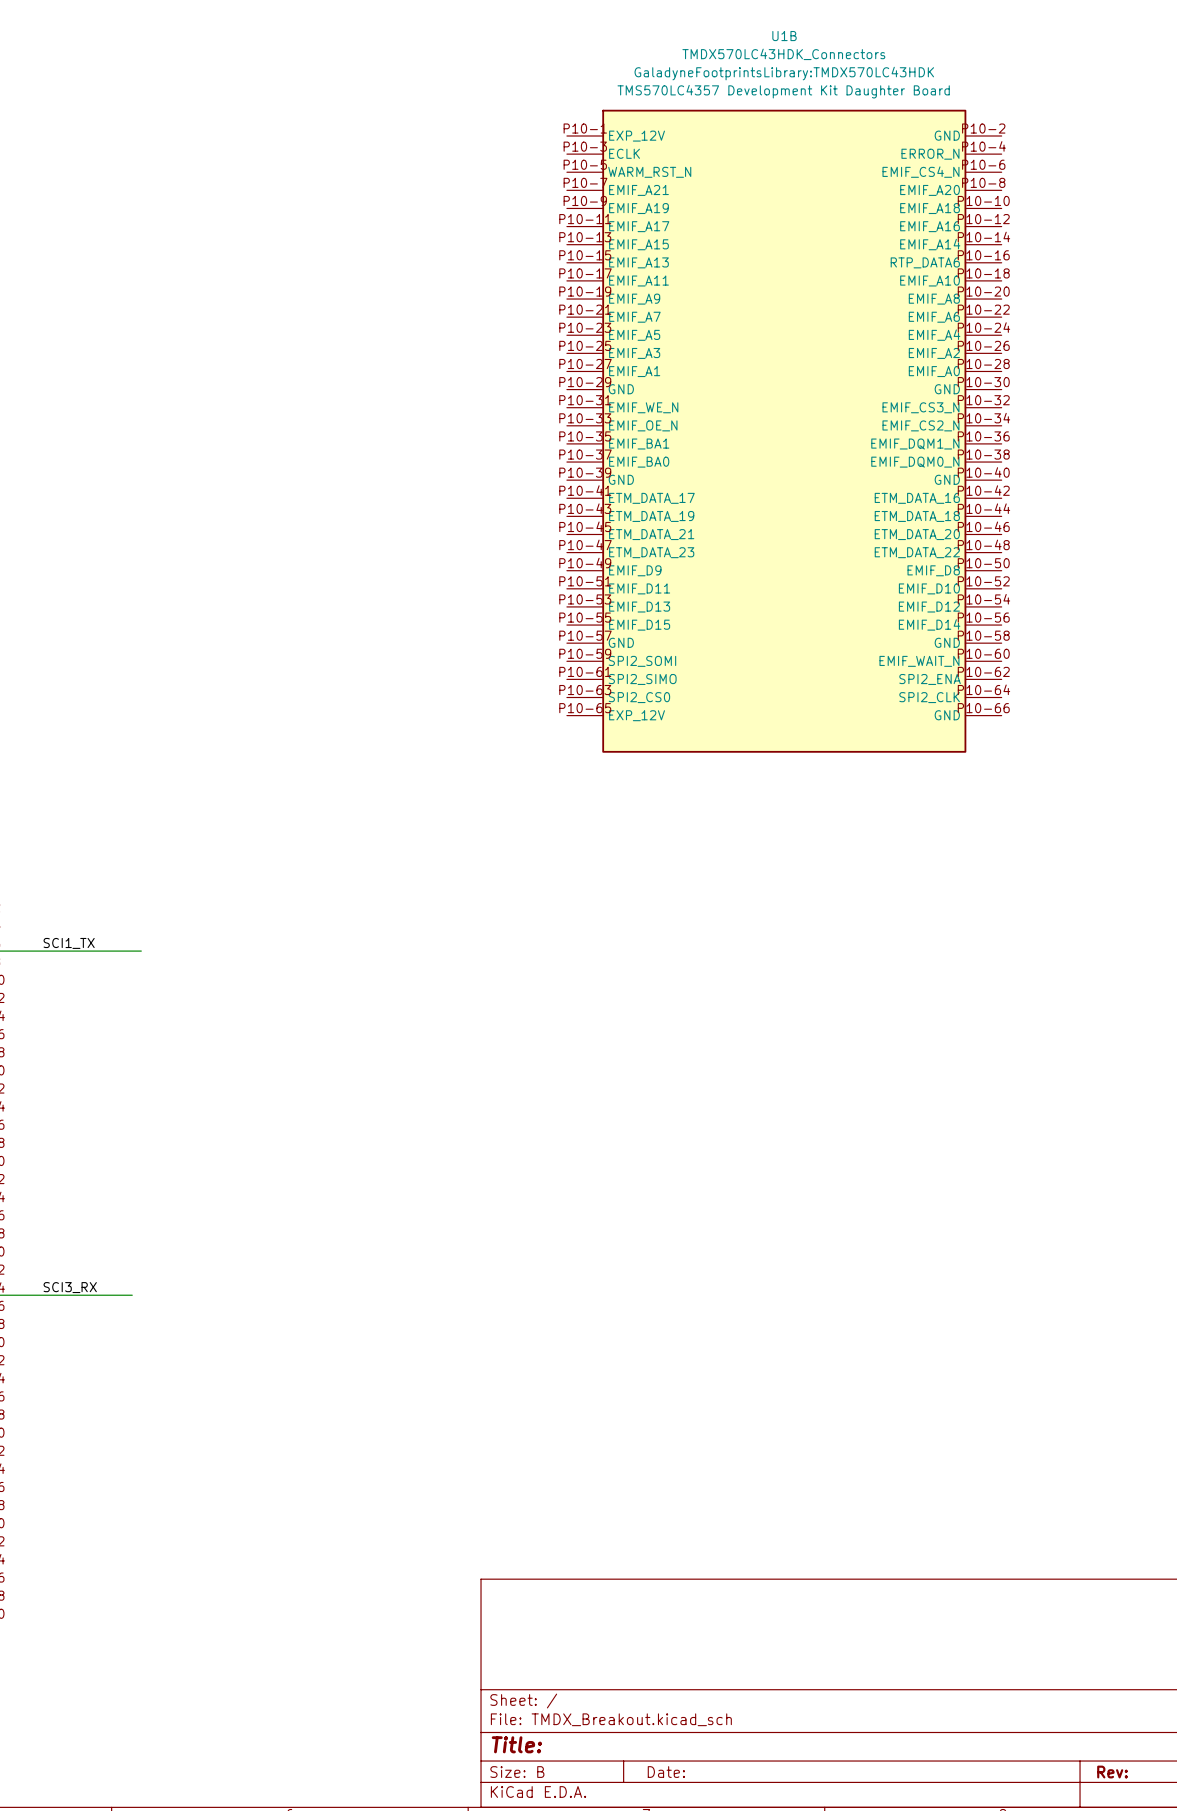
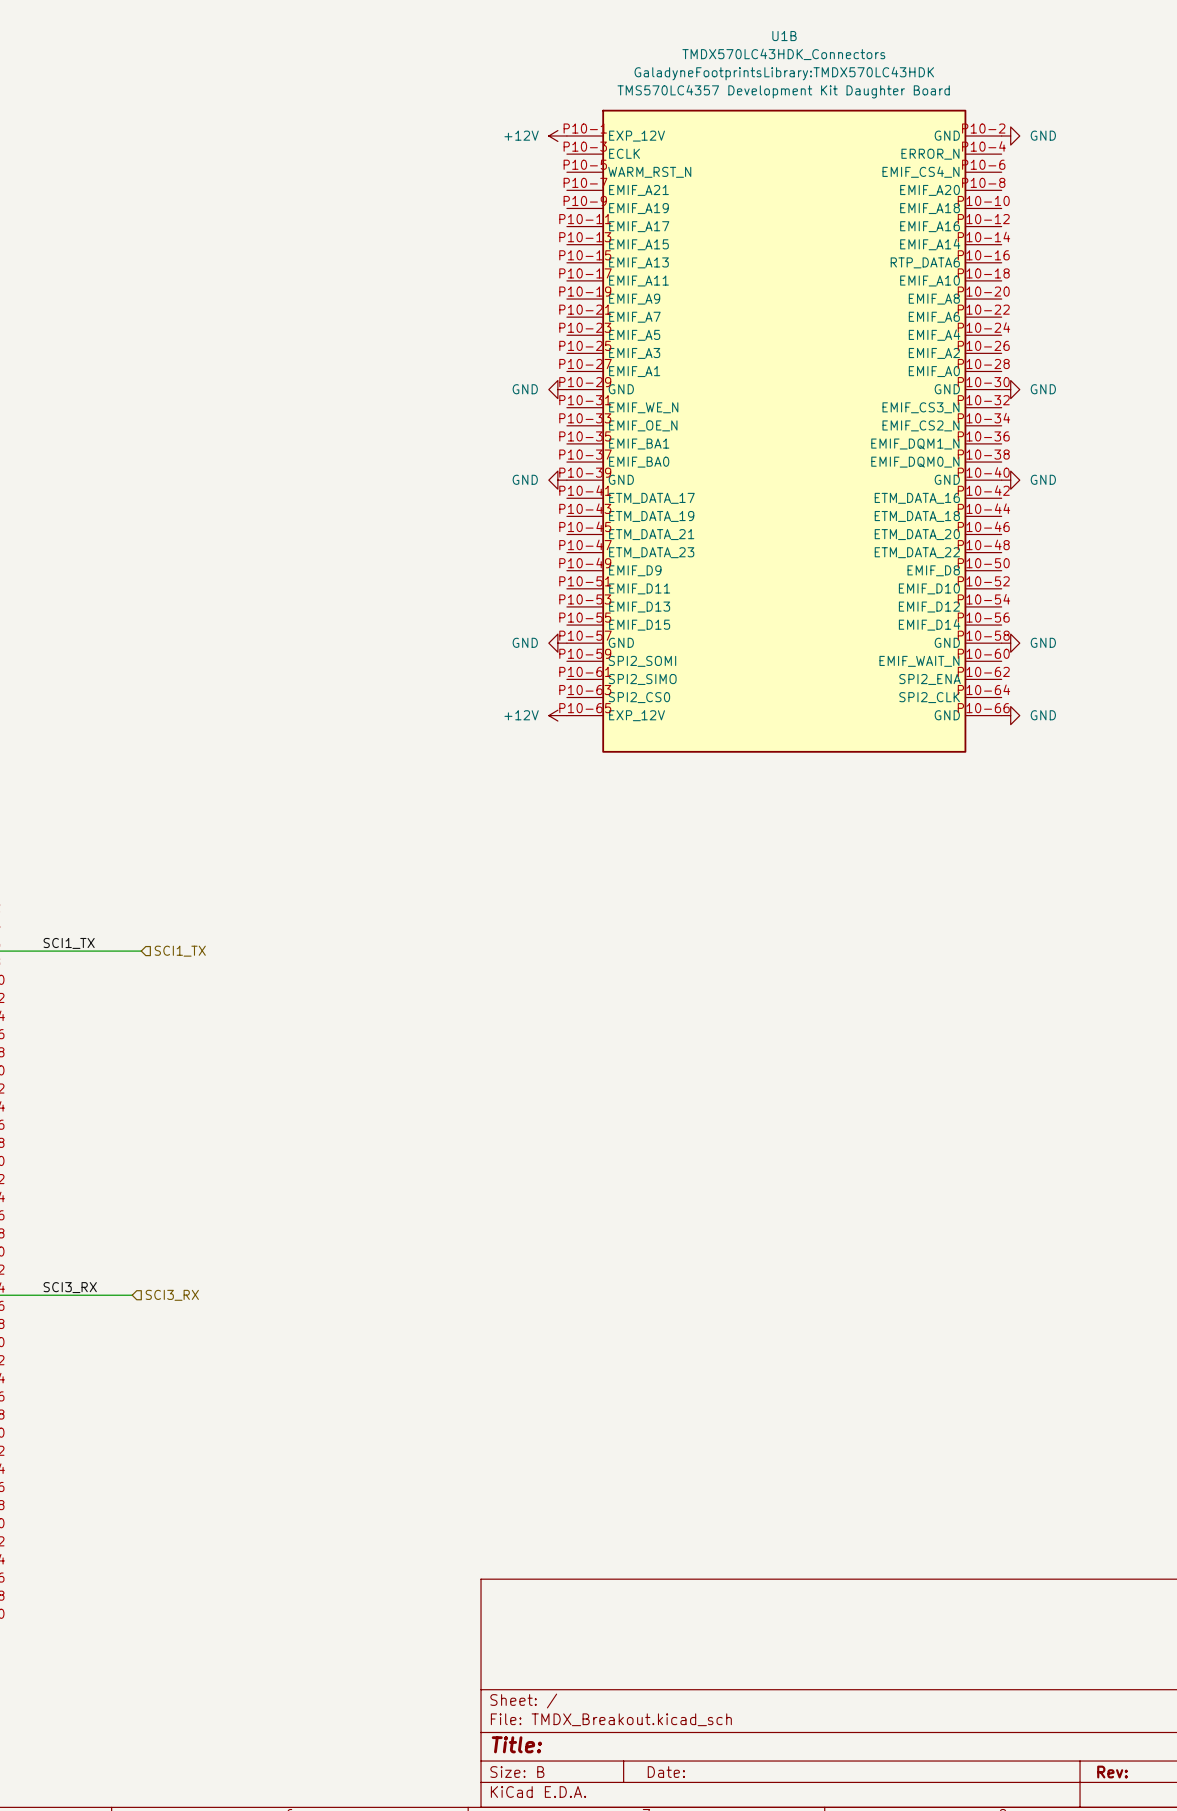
power symbol: none -> +12V (557, 136)
power symbol: none -> GND (1010, 136)
power symbol: none -> GND (557, 389)
power symbol: none -> GND (1010, 389)
power symbol: none -> GND (557, 480)
power symbol: none -> GND (1010, 480)
power symbol: none -> GND (557, 643)
power symbol: none -> GND (1010, 643)
power symbol: none -> +12V (557, 715)
power symbol: none -> GND (1010, 715)
hierarchical label: none -> SCI1_TX (180, 951)
hierarchical label: none -> SCI3_RX (172, 1295)

